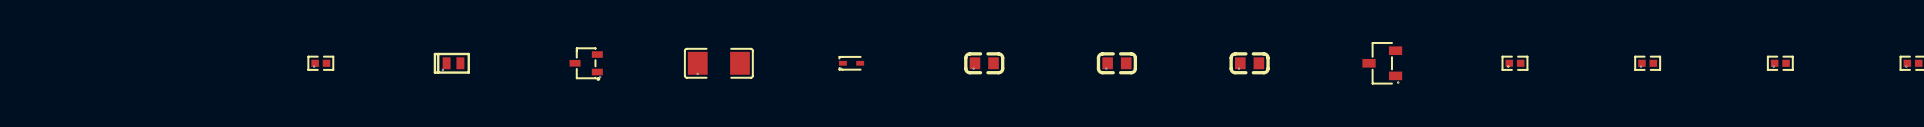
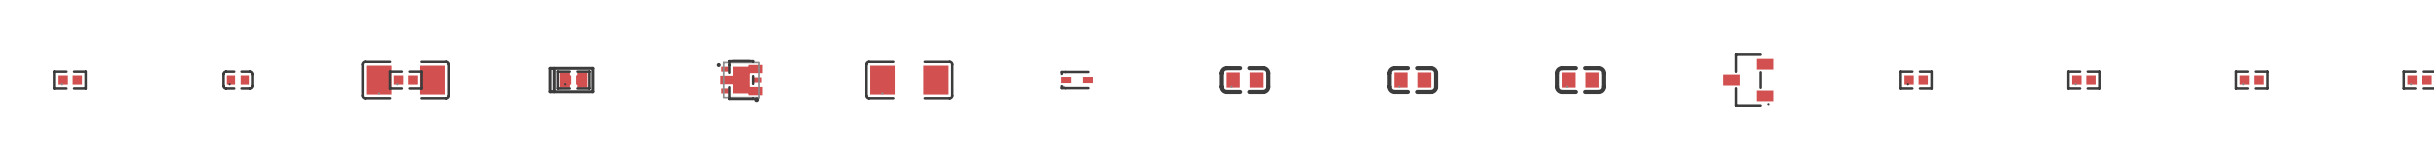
part: none -> (739, 79)
part: none -> (70, 80)
part: none -> (237, 80)
part: none -> (405, 80)
part: none -> (573, 80)

